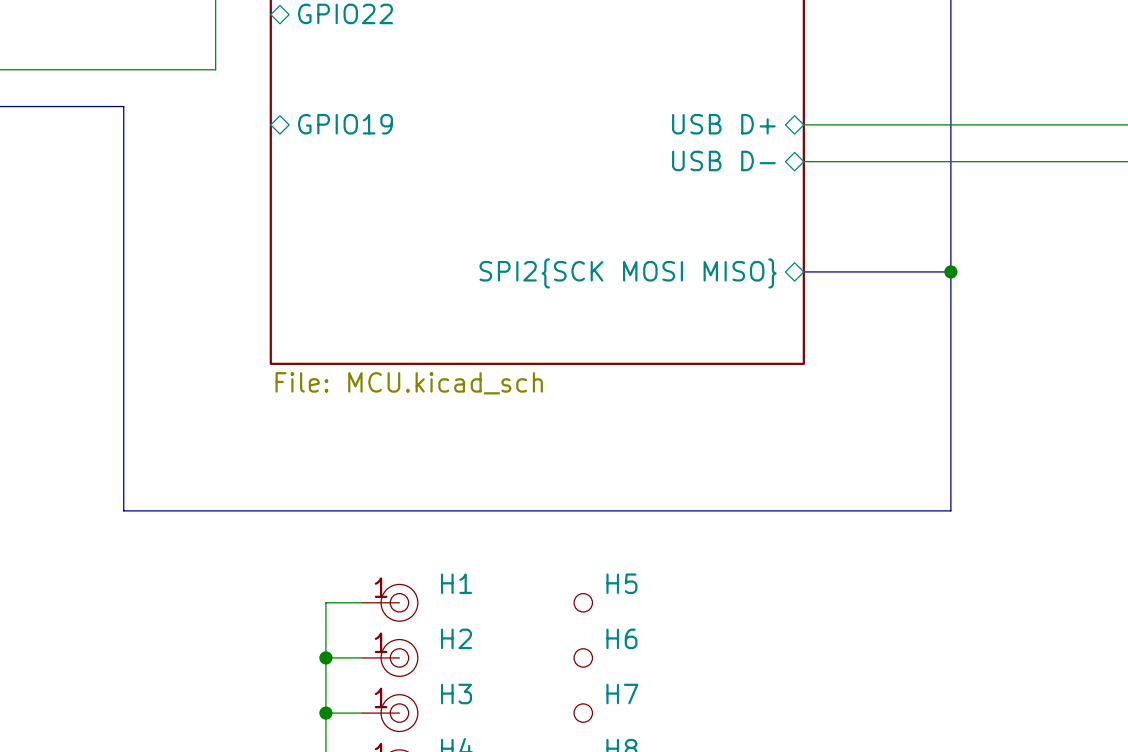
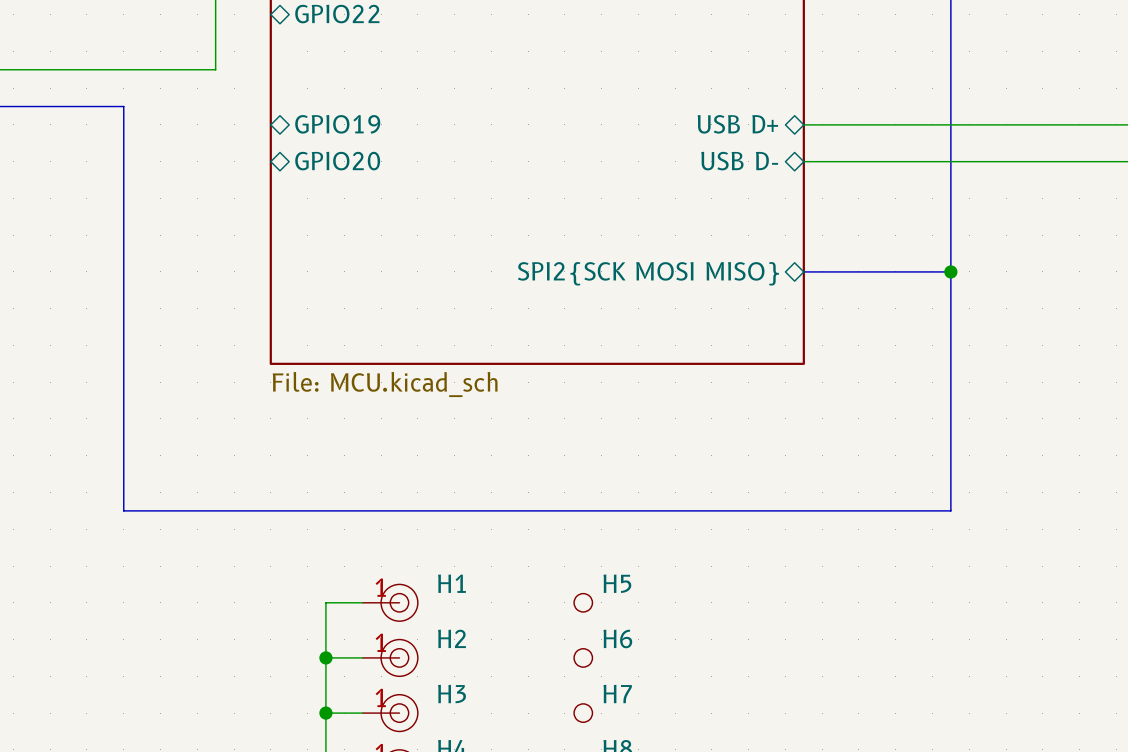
sheet pin: none -> GPIO20 (337, 161)

